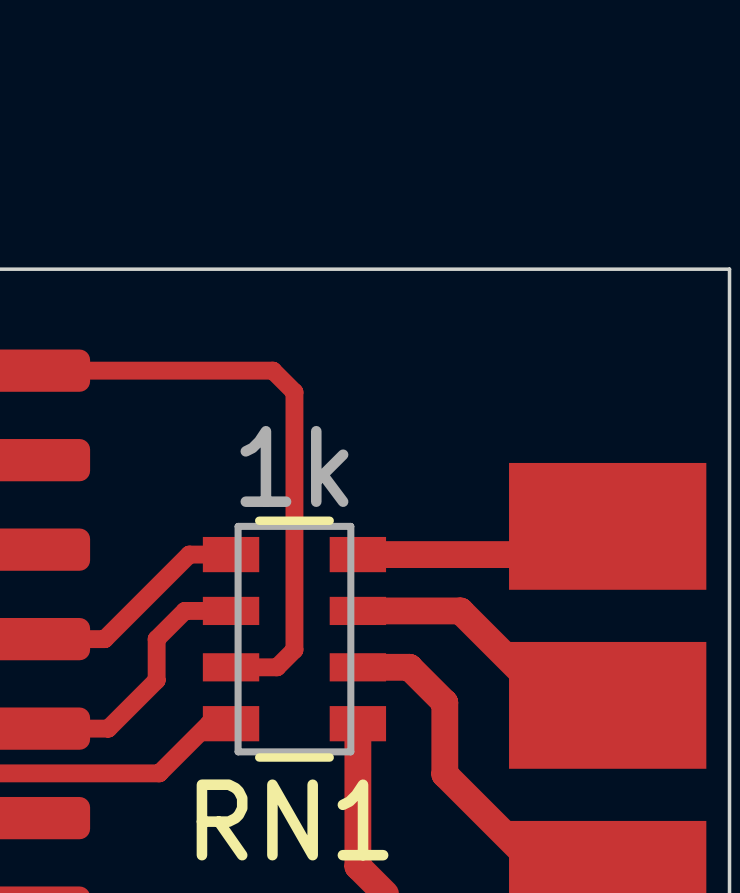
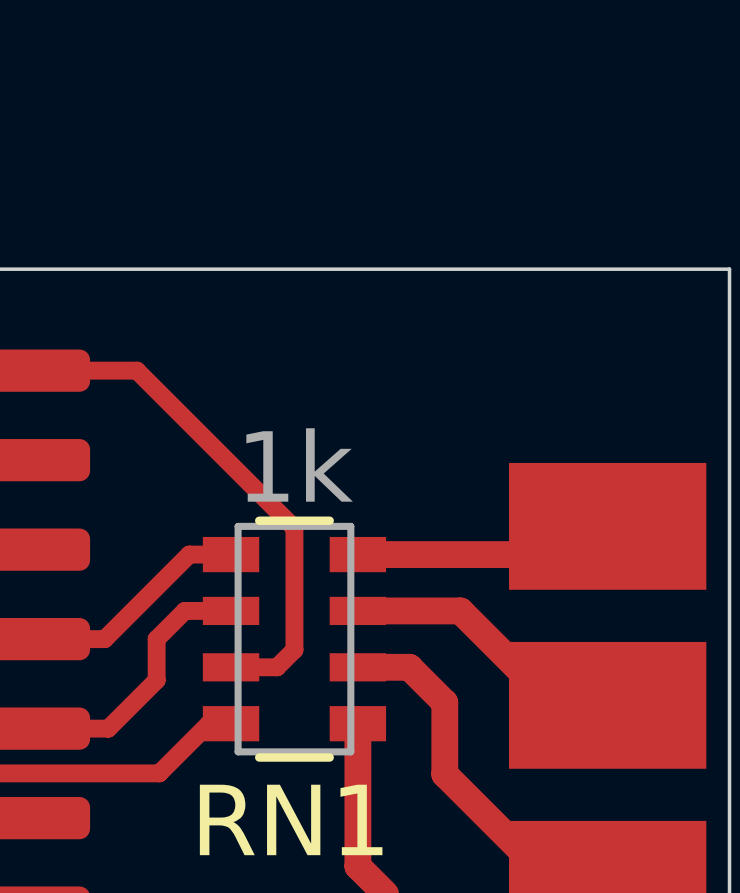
top track: (136, 370) (272, 370) (294, 392) (294, 528) -> (136, 370) (294, 528)

